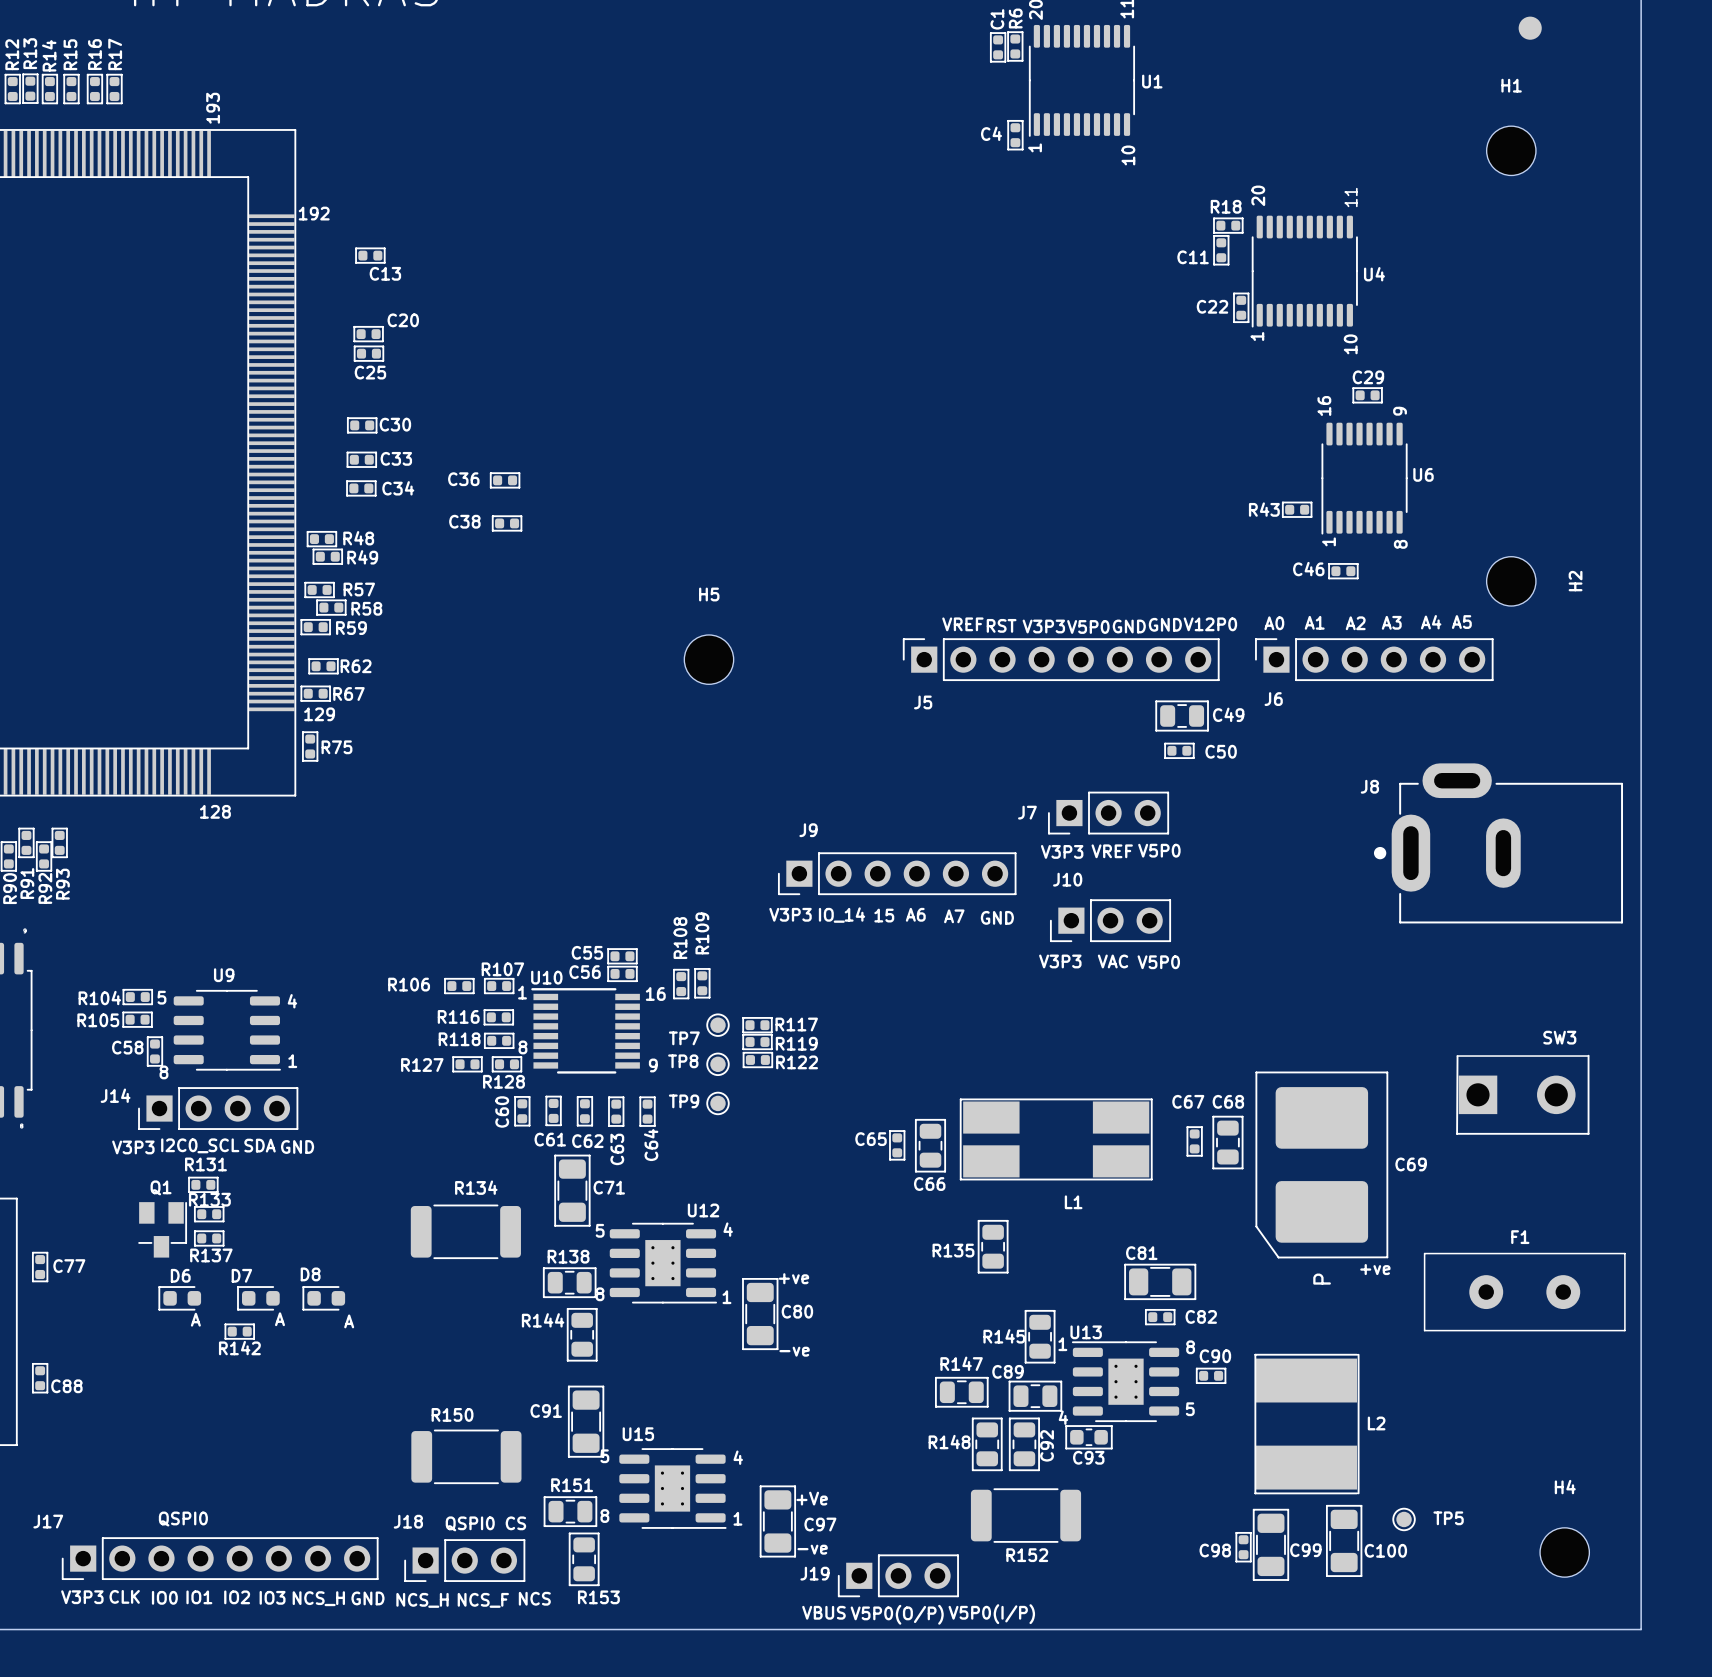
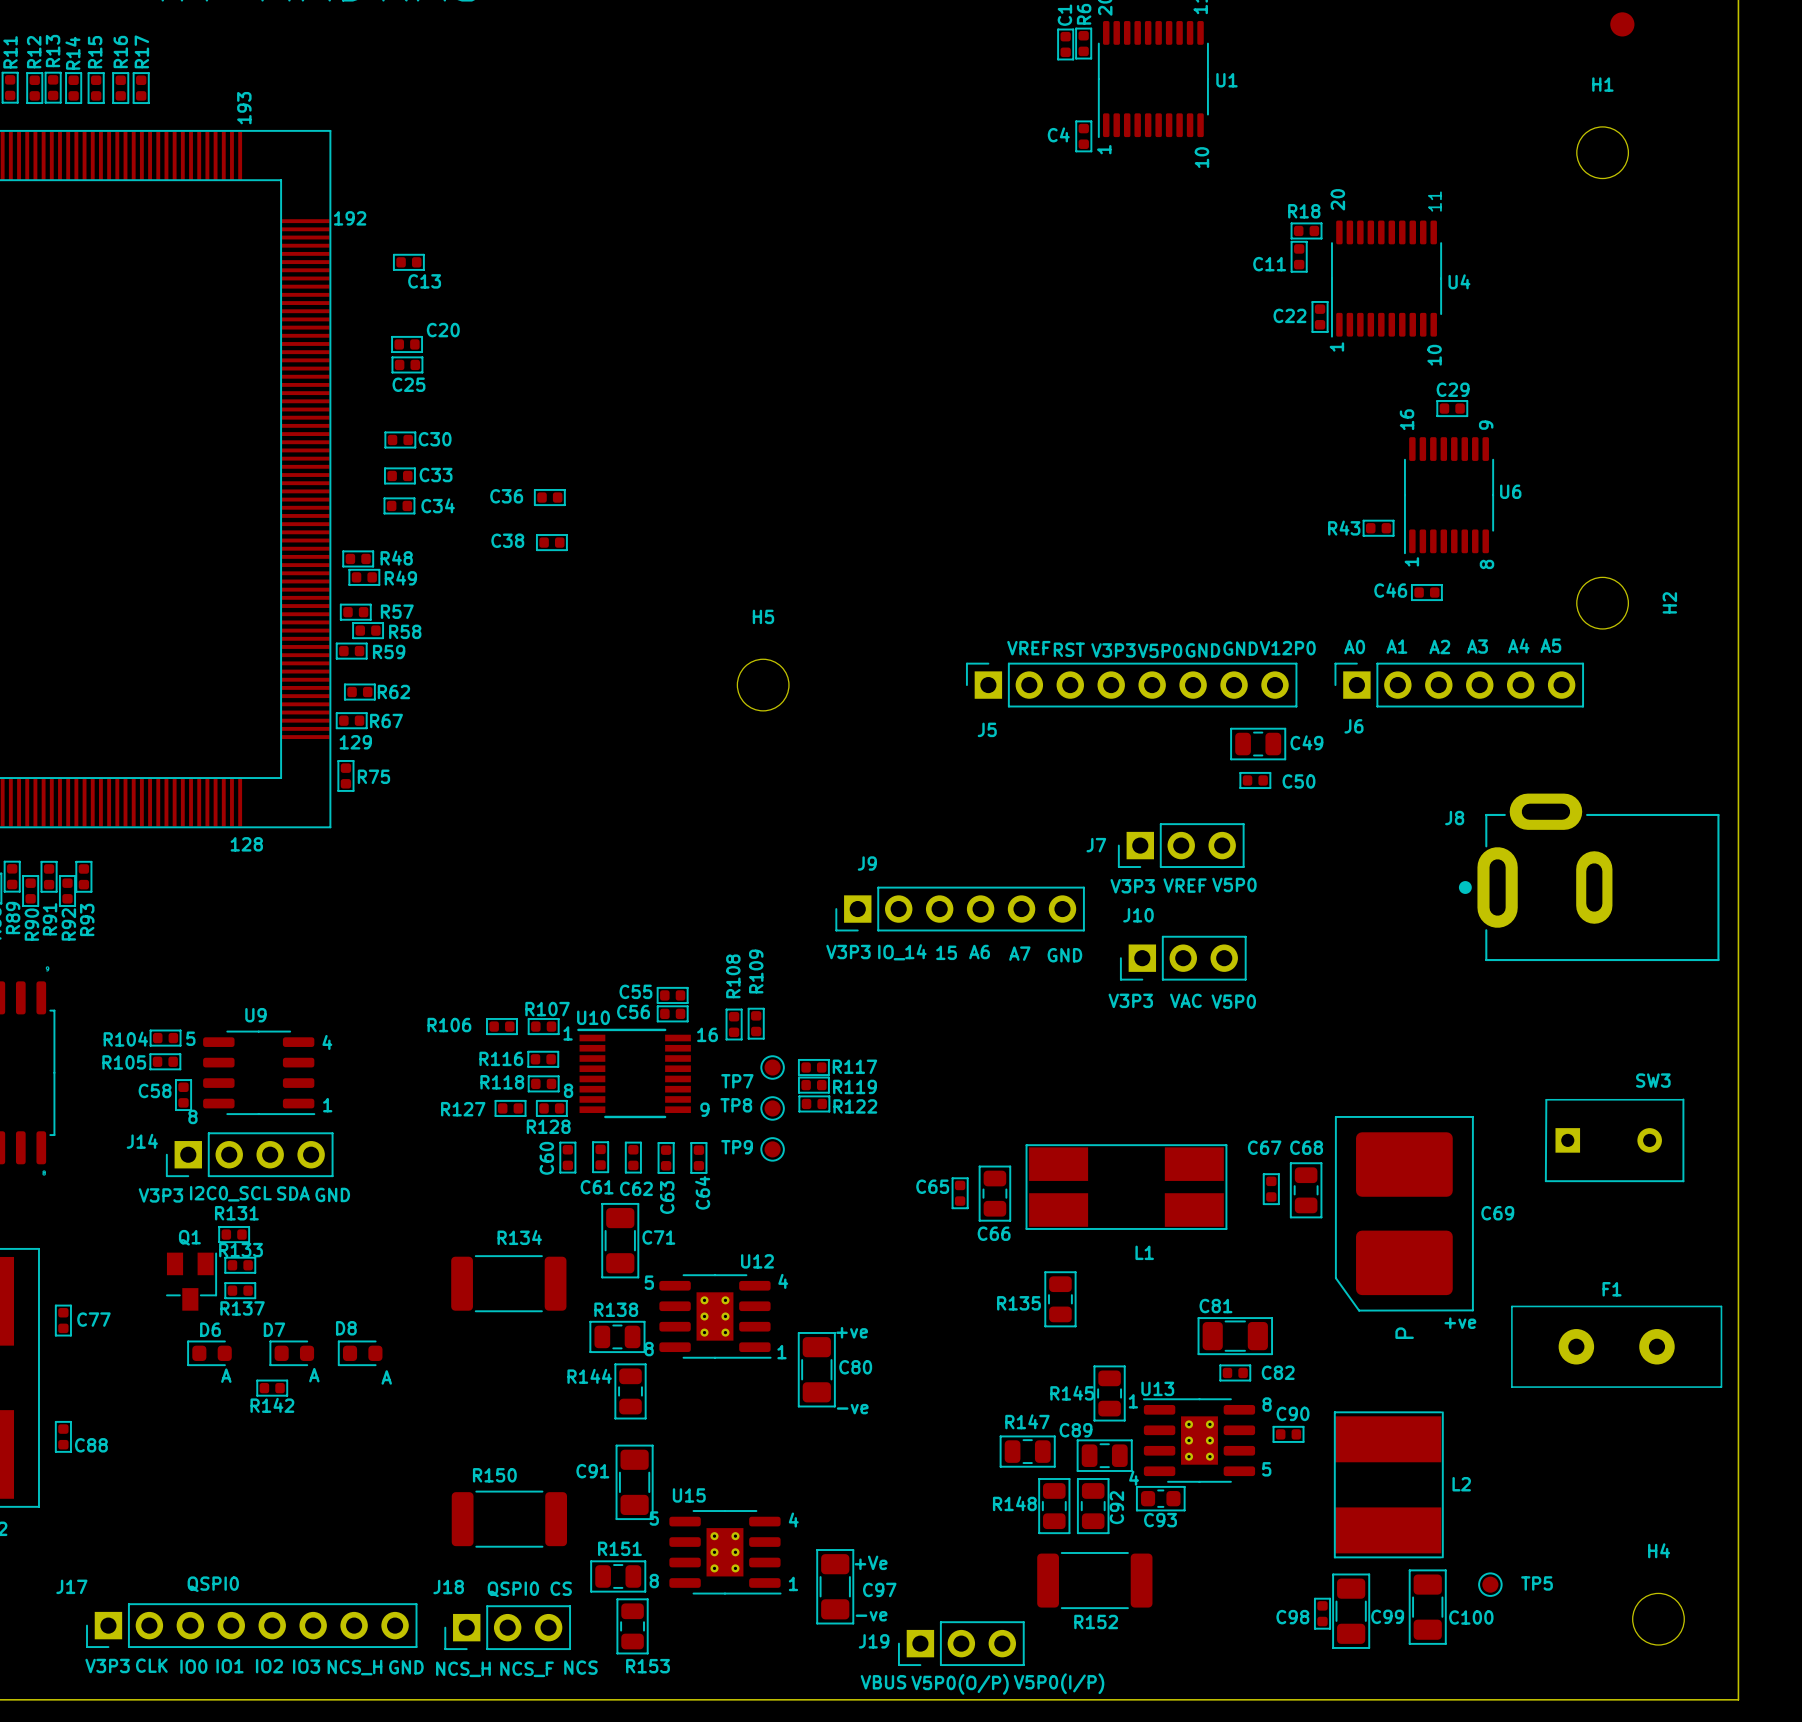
SW3 footprint: [1456, 1054, 1590, 1135] -> [1544, 1098, 1685, 1183]

